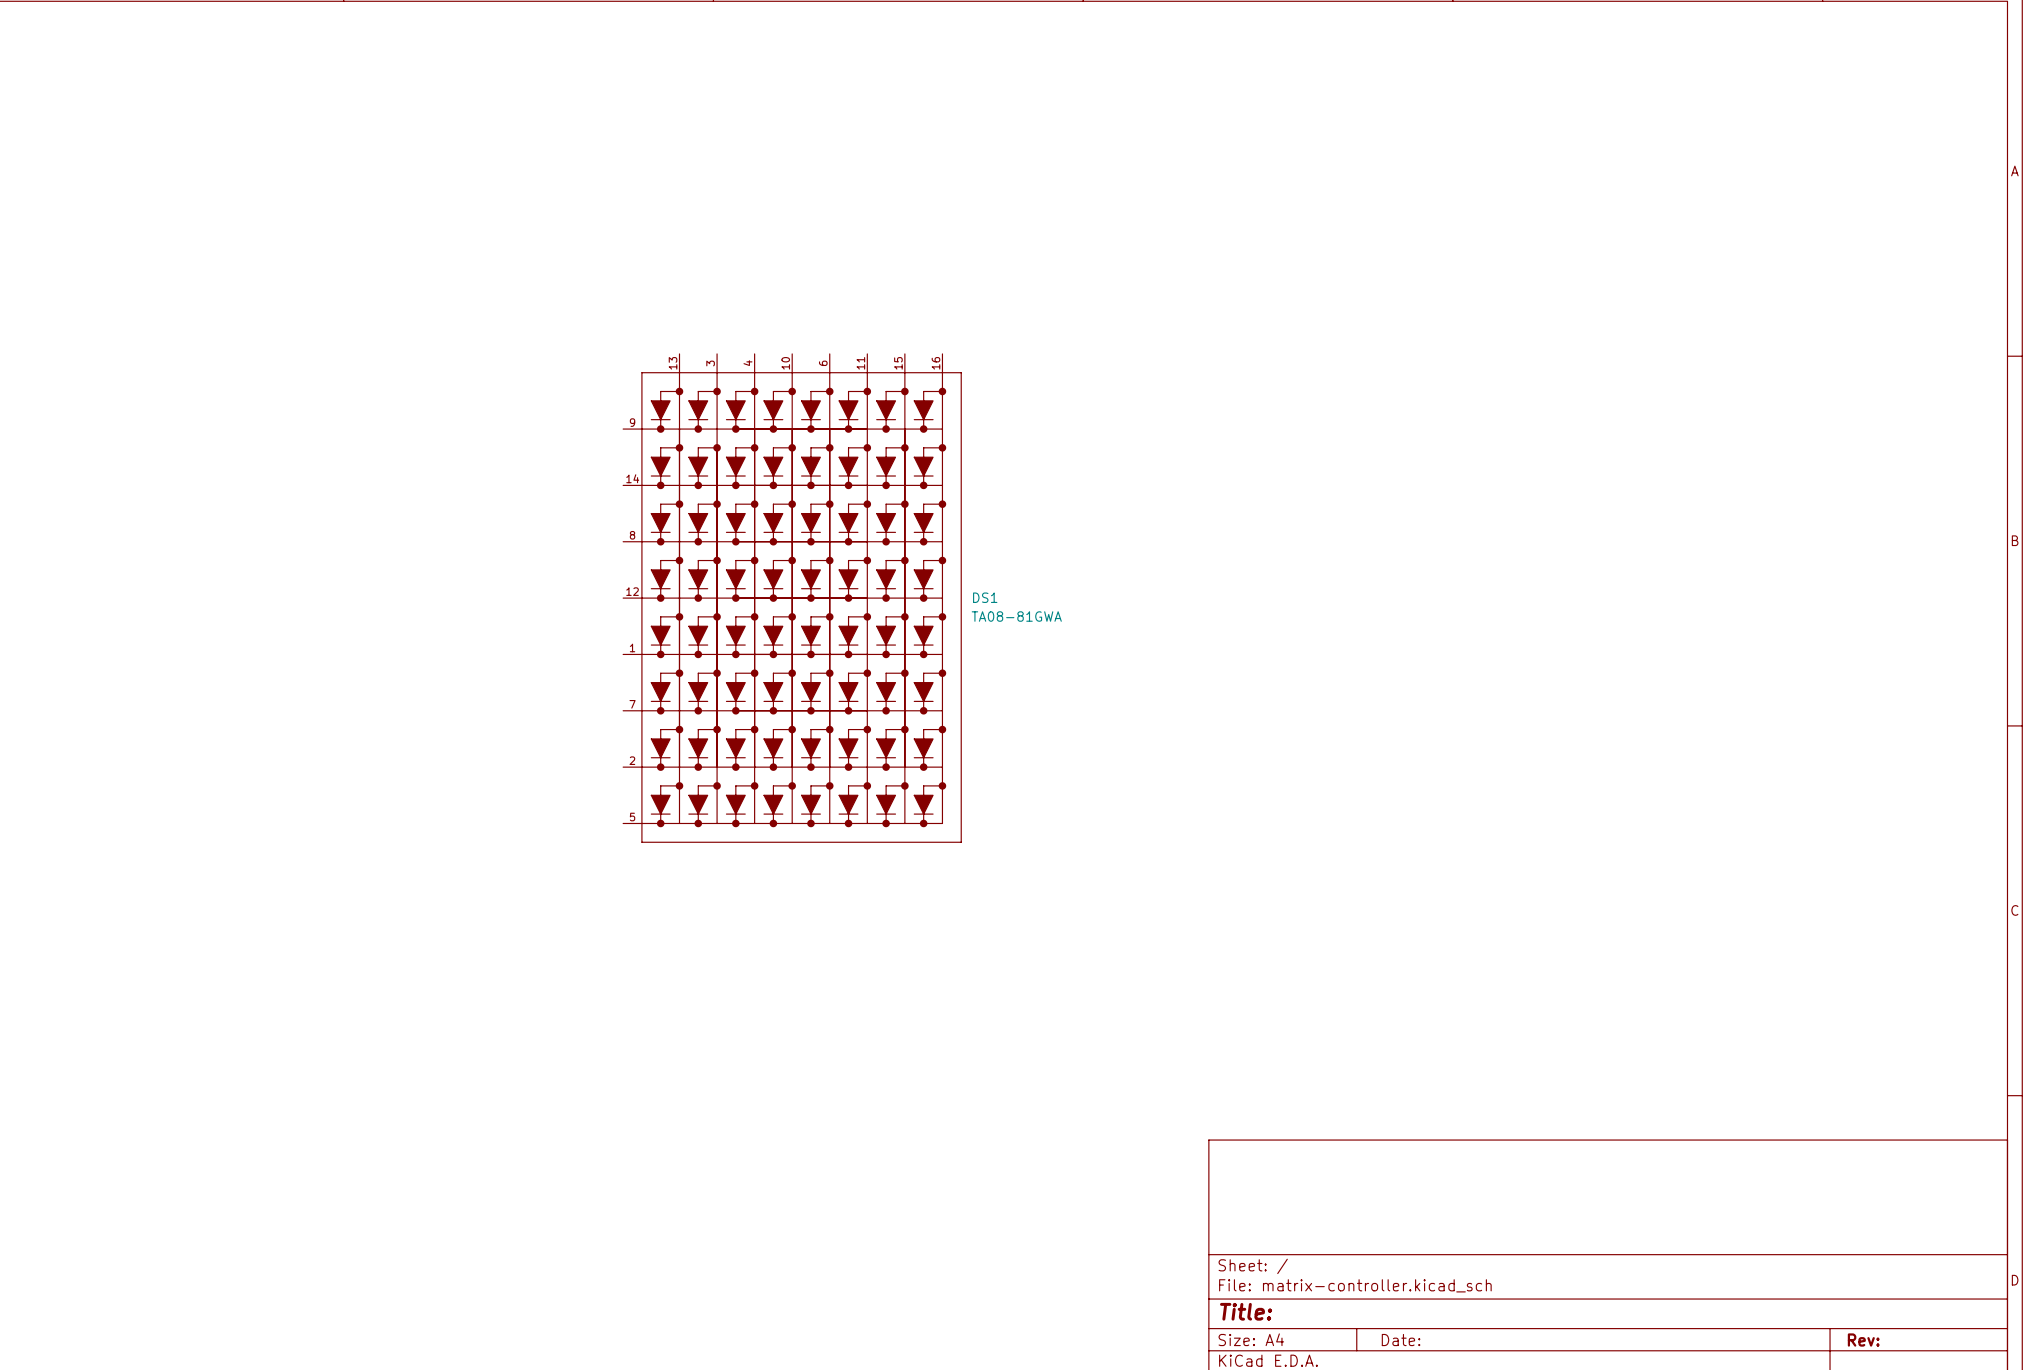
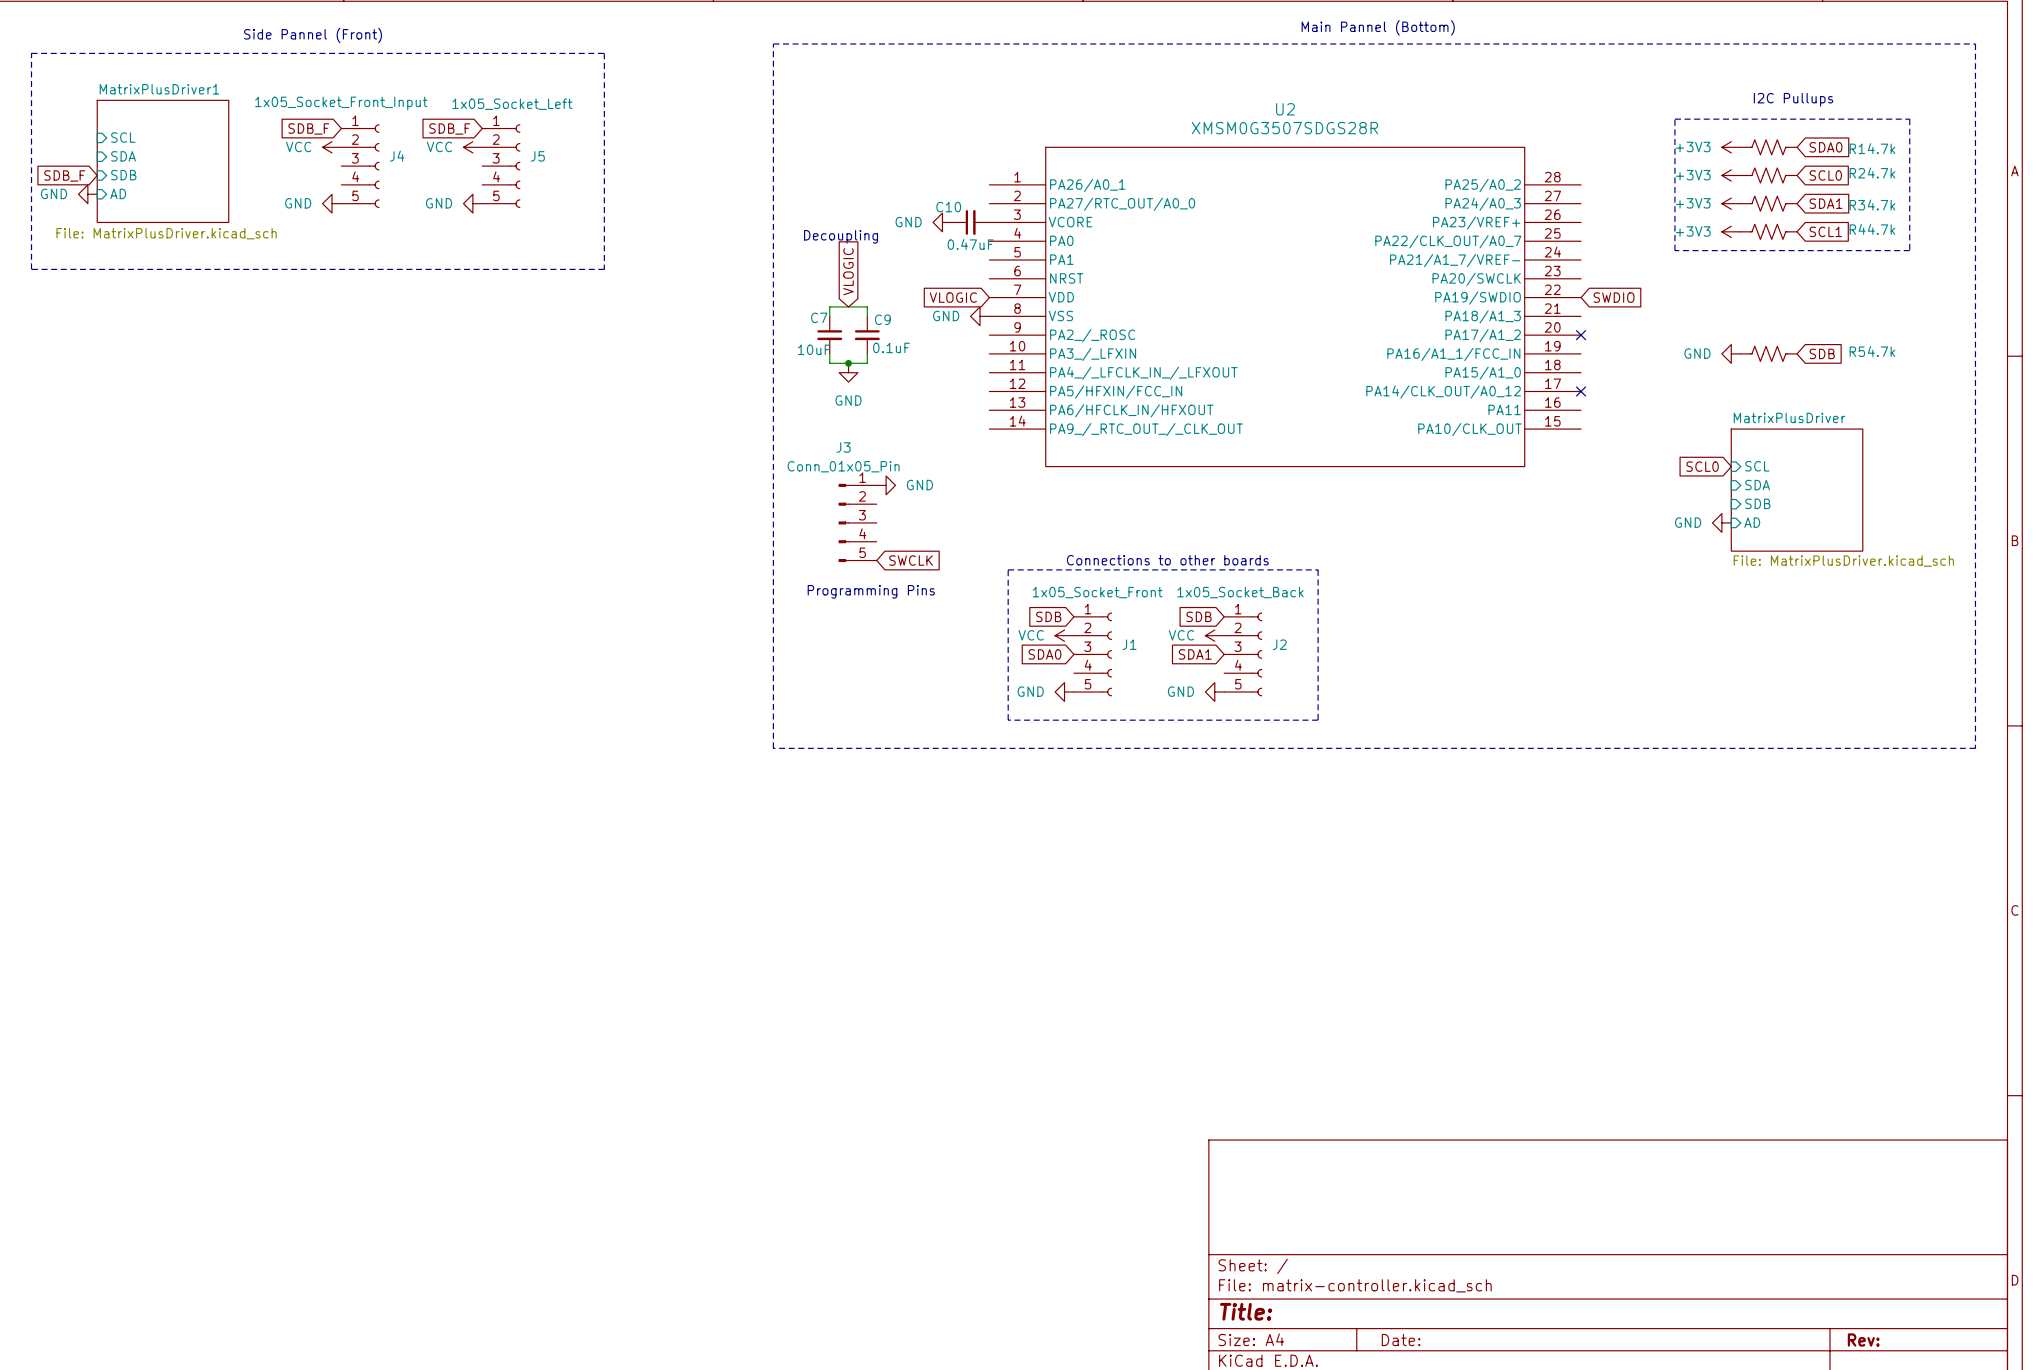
text: none -> Main Pannel (Bottom) (1378, 27)
text: none -> Side Pannel (Front) (313, 35)
line: none -> (773, 44) (1975, 44) (1975, 748) (773, 748) (773, 44)
line: none -> (31, 53) (604, 53) (604, 269) (31, 269) (31, 53)
text: none -> I2C Pullups (1793, 99)
line: none -> (1674, 119) (1909, 119) (1909, 250) (1674, 250) (1674, 119)
global label: none -> SDB_F (308, 128)
global label: none -> SDB_F (449, 128)
sheet pin: none -> SCL (123, 137)
power symbol: none -> VCC (332, 147)
power symbol: none -> VCC (472, 147)
power symbol: none -> +3V3 (1731, 147)
R1: none -> 4.7k (1768, 147)
global label: none -> SDA0 (1826, 147)
sheet pin: none -> SDA (123, 156)
sheet MatrixPlusDriver1: none -> File: MatrixPlusDriver.kicad_sch (162, 161)
J4: none -> 1x05_Socket_Front_Input (360, 166)
J5: none -> 1x05_Socket_Left (501, 166)
global label: none -> SDB_F (64, 175)
sheet pin: none -> SDB (123, 175)
power symbol: none -> +3V3 (1731, 175)
R2: none -> 4.7k (1768, 175)
global label: none -> SCL0 (1825, 175)
sheet pin: none -> AD (118, 193)
power symbol: none -> GND (87, 194)
power symbol: none -> GND (332, 203)
power symbol: none -> GND (472, 203)
power symbol: none -> +3V3 (1731, 203)
R3: none -> 4.7k (1768, 203)
global label: none -> SDA1 (1826, 203)
power symbol: none -> GND (942, 222)
C10: none -> 0.47uF (970, 222)
power symbol: none -> +3V3 (1731, 231)
R4: none -> 4.7k (1768, 231)
global label: none -> SCL1 (1825, 231)
text: none -> Decoupling (841, 236)
global label: none -> VLOGIC (848, 271)
global label: none -> VLOGIC (953, 297)
global label: none -> SWDIO (1614, 297)
U2: none -> XMSM0G3507SDGS28R (1285, 306)
wire: none -> (829, 316) (829, 306) (867, 306) (867, 316)
power symbol: none -> GND (980, 316)
C7: none -> 10uF (829, 335)
C9: none -> 0.1uF (867, 335)
no-connect mark: none -> (1581, 335)
wire: none -> (829, 353) (829, 363) (867, 363) (867, 353)
power symbol: none -> GND (1731, 353)
R5: none -> 4.7k (1768, 353)
global label: none -> SDB (1822, 353)
junction: none -> (848, 363)
power symbol: none -> GND (848, 372)
no-connect mark: none -> (1581, 391)
global label: none -> SCL0 (1702, 466)
sheet pin: none -> SCL (1757, 466)
power symbol: none -> GND (886, 485)
sheet pin: none -> SDA (1757, 485)
sheet MatrixPlusDriver: none -> File: MatrixPlusDriver.kicad_sch (1797, 490)
sheet pin: none -> SDB (1757, 503)
J3: none -> Conn_01x05_Pin (857, 522)
power symbol: none -> GND (1721, 522)
sheet pin: none -> AD (1752, 522)
global label: none -> SWCLK (911, 560)
text: none -> Connections to other boards (1167, 560)
line: none -> (1008, 569) (1318, 569) (1318, 720) (1008, 720) (1008, 569)
text: none -> Programming Pins (871, 591)
DS1: TA08-81GWA (792, 598) -> none
global label: none -> SDB (1048, 616)
global label: none -> SDB (1199, 616)
power symbol: none -> VCC (1064, 635)
power symbol: none -> VCC (1214, 635)
global label: none -> SDA0 (1044, 654)
J1: none -> 1x05_Socket_Front (1092, 654)
global label: none -> SDA1 (1195, 654)
J2: none -> 1x05_Socket_Back (1243, 654)
power symbol: none -> GND (1064, 692)
power symbol: none -> GND (1214, 692)

